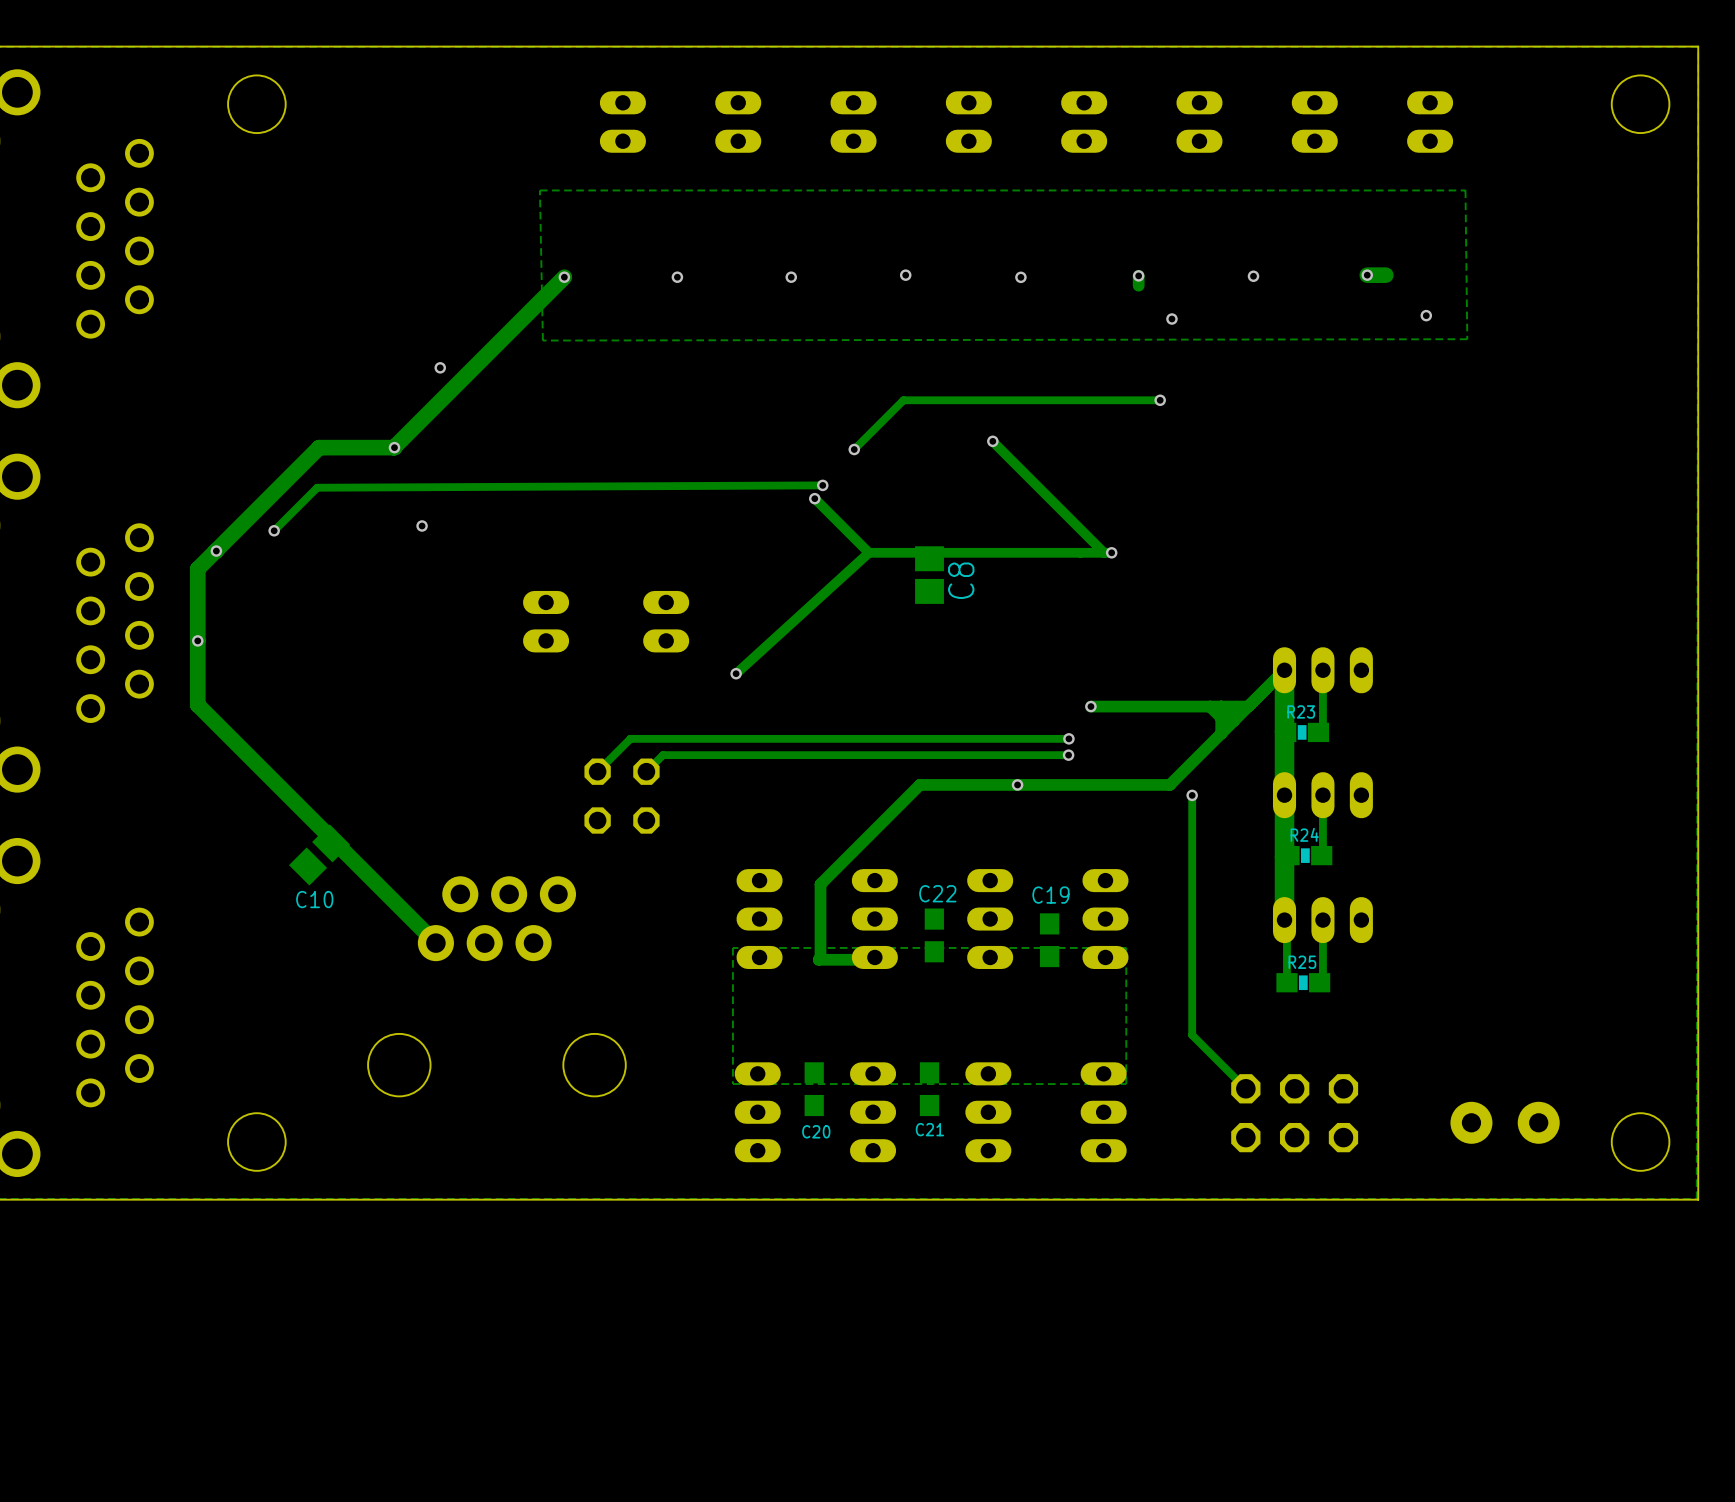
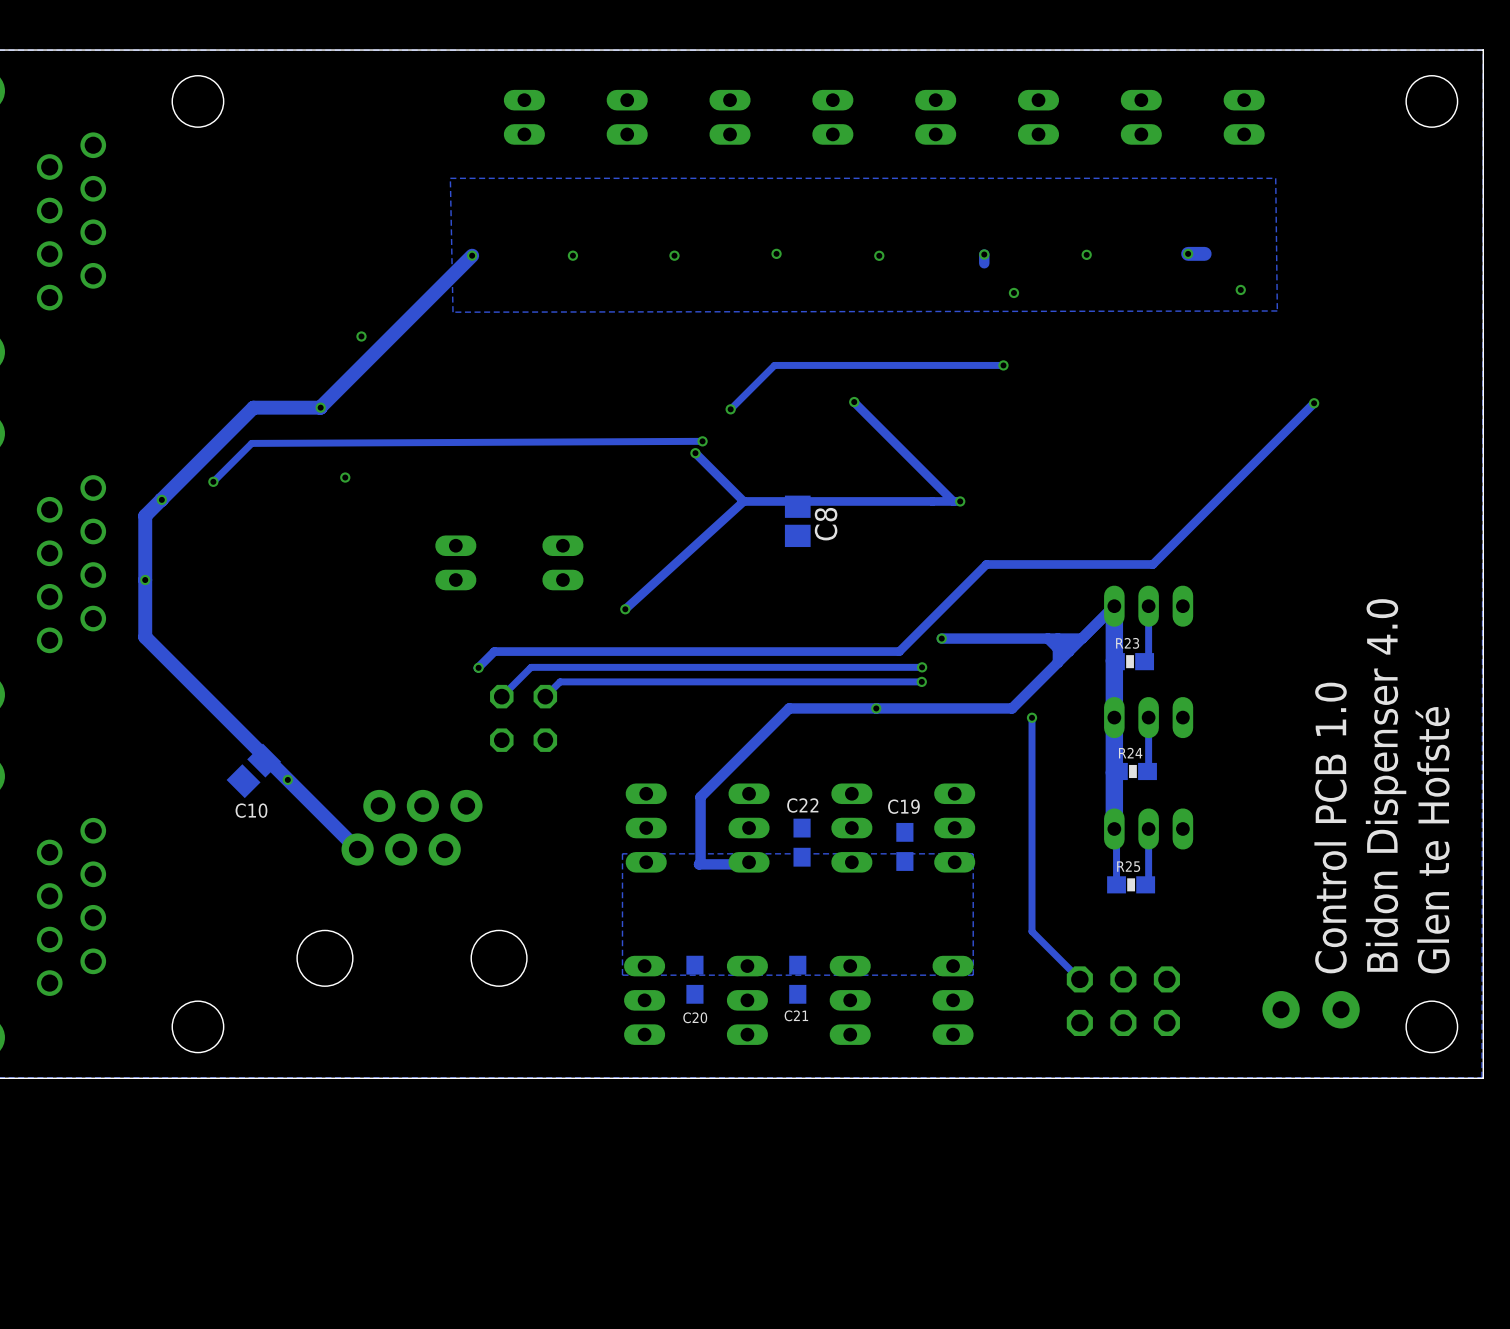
track: none -> (1314, 403) (1152, 564) (986, 564) (899, 651) (494, 651) (478, 668)
via: none -> (1314, 403)
via: none -> (478, 667)
text: none -> Bidon Dispenser 4.0 (1386, 785)
via: none -> (287, 779)
text: none -> Control PCB 1.0 (1330, 828)
text: none -> Glen te Hofsté (1432, 840)

